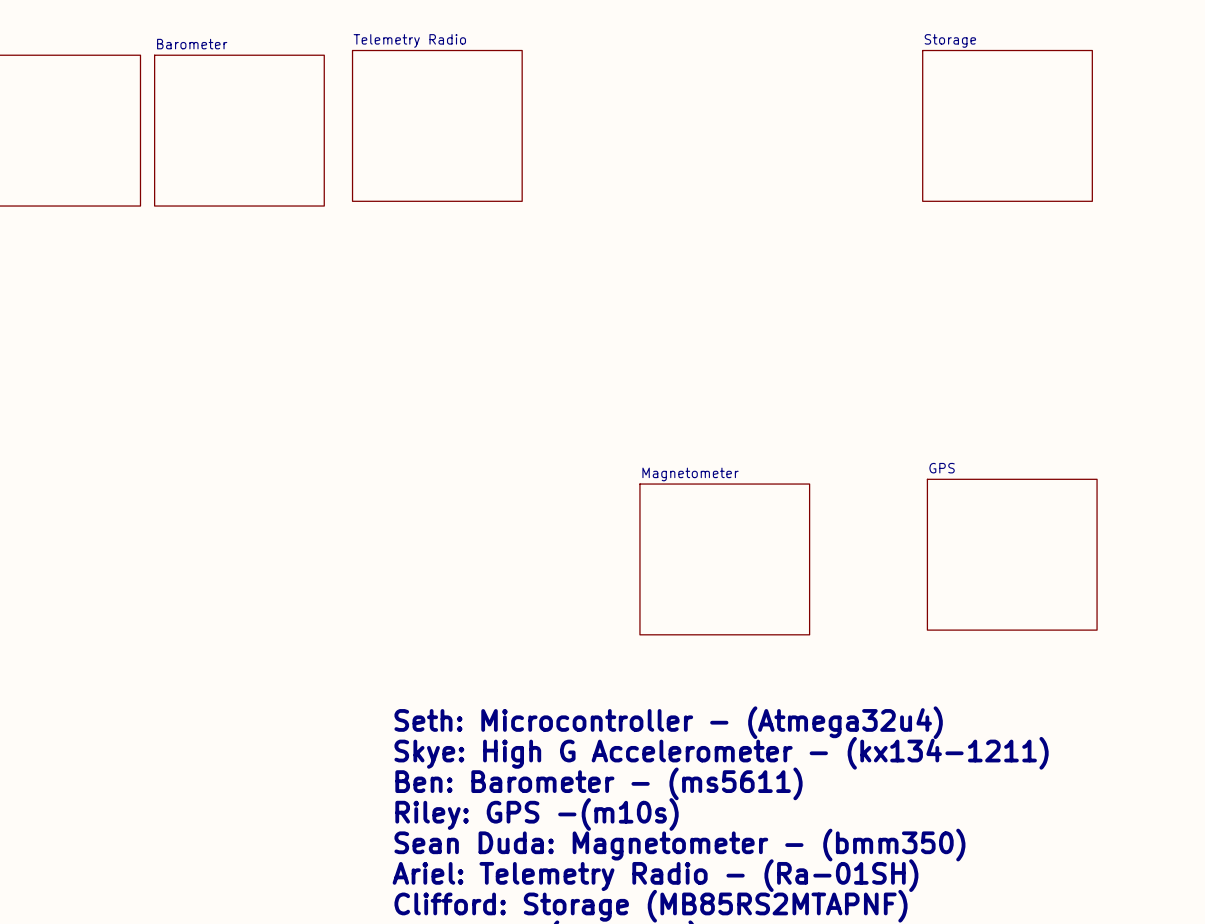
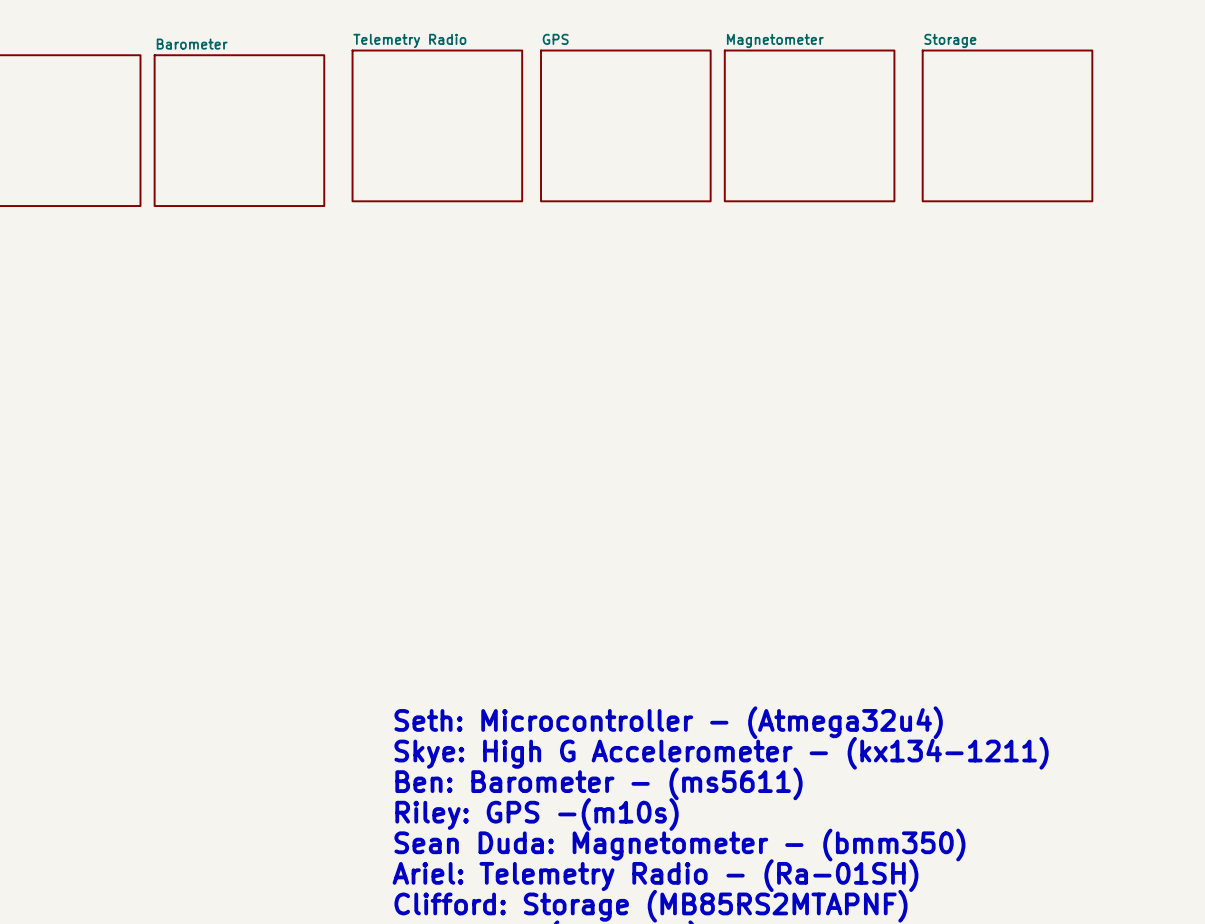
sheet GPS: none -> (625, 125)
sheet Magnetometer: none -> (809, 125)
sheet GPS: (1012, 554) -> none
sheet Magnetometer: (724, 559) -> none

